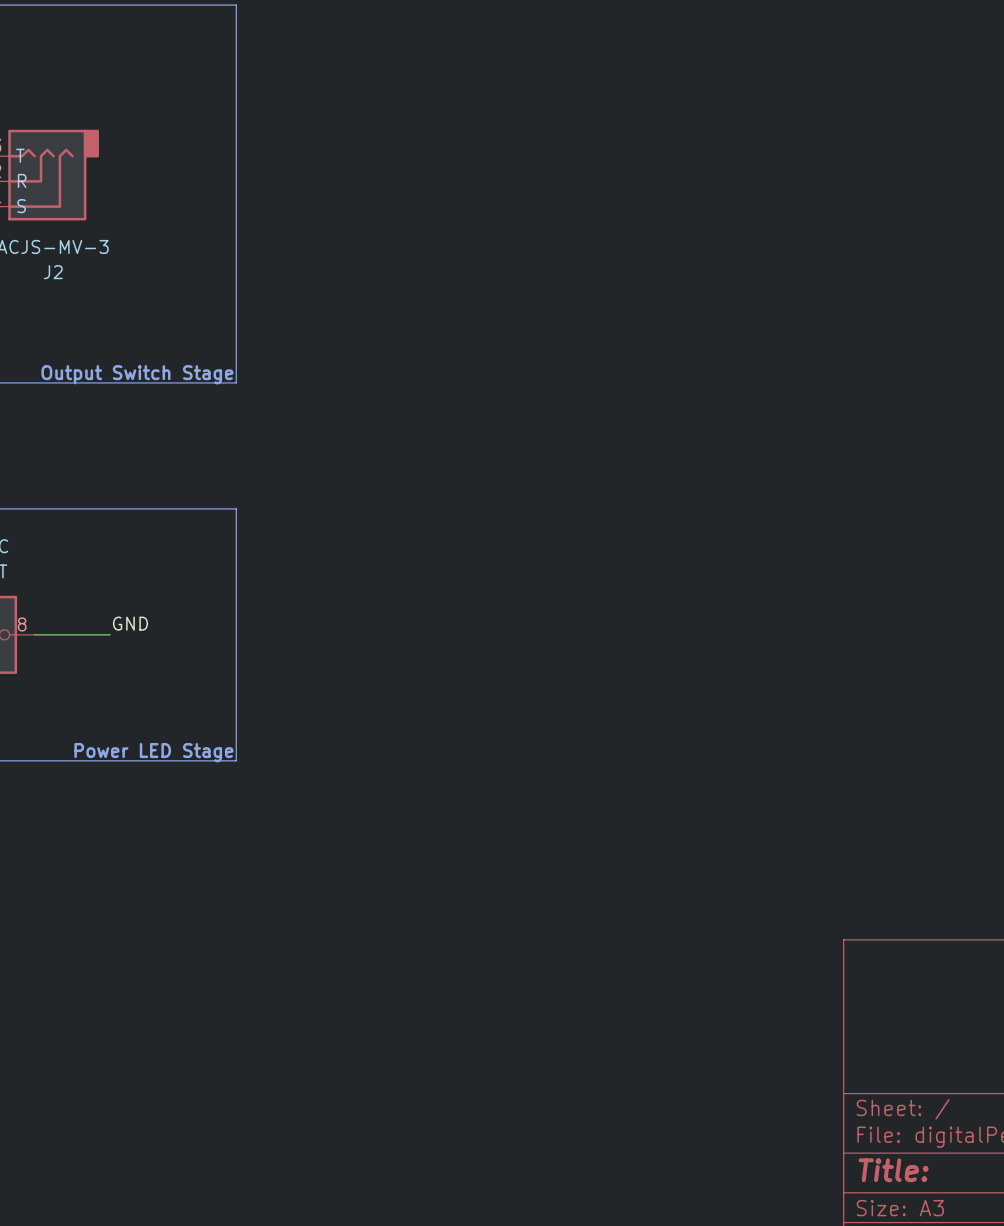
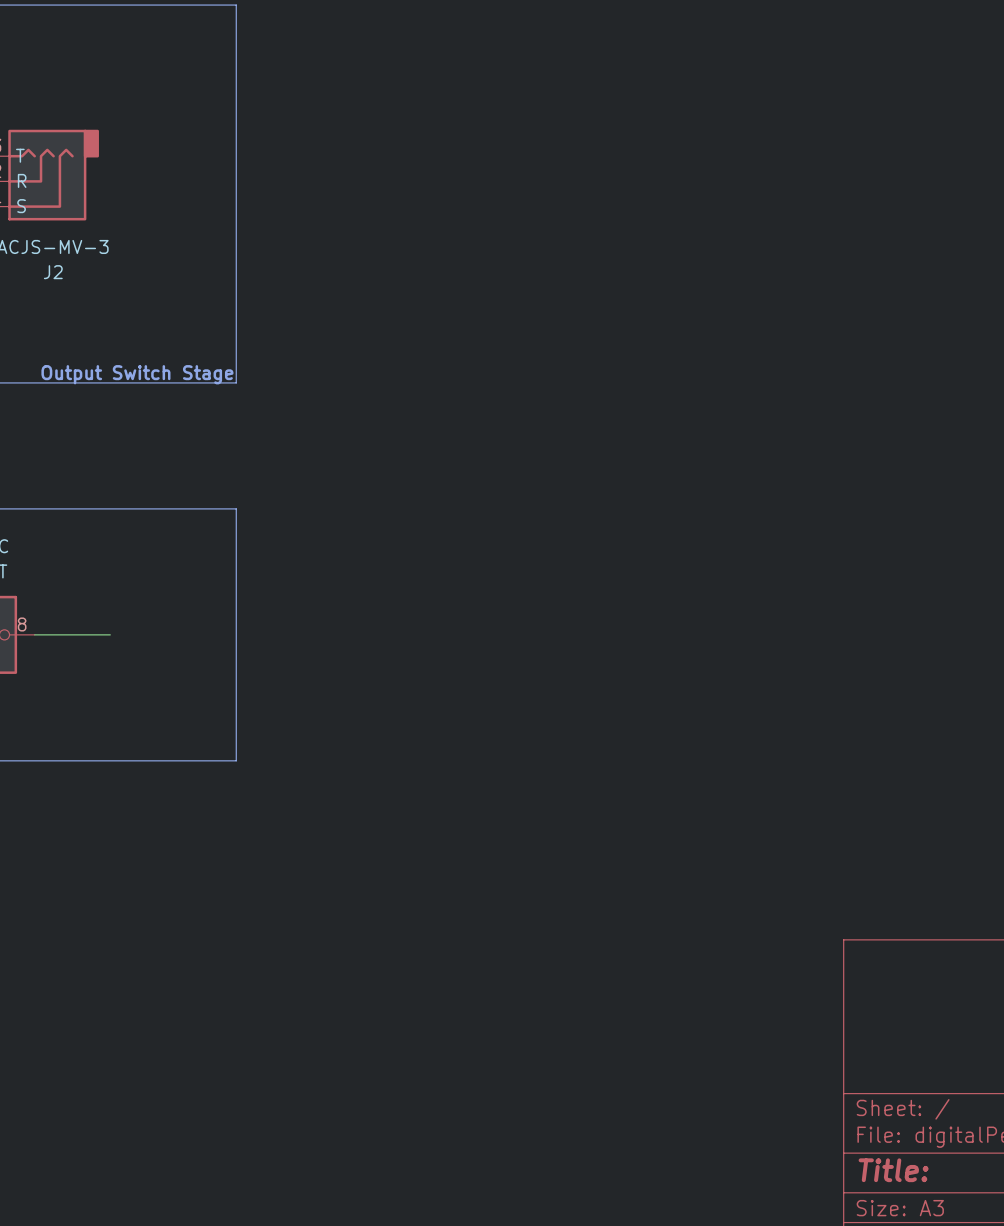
label: GND (130, 623) -> none
text: Power LED Stage (153, 752) -> none

